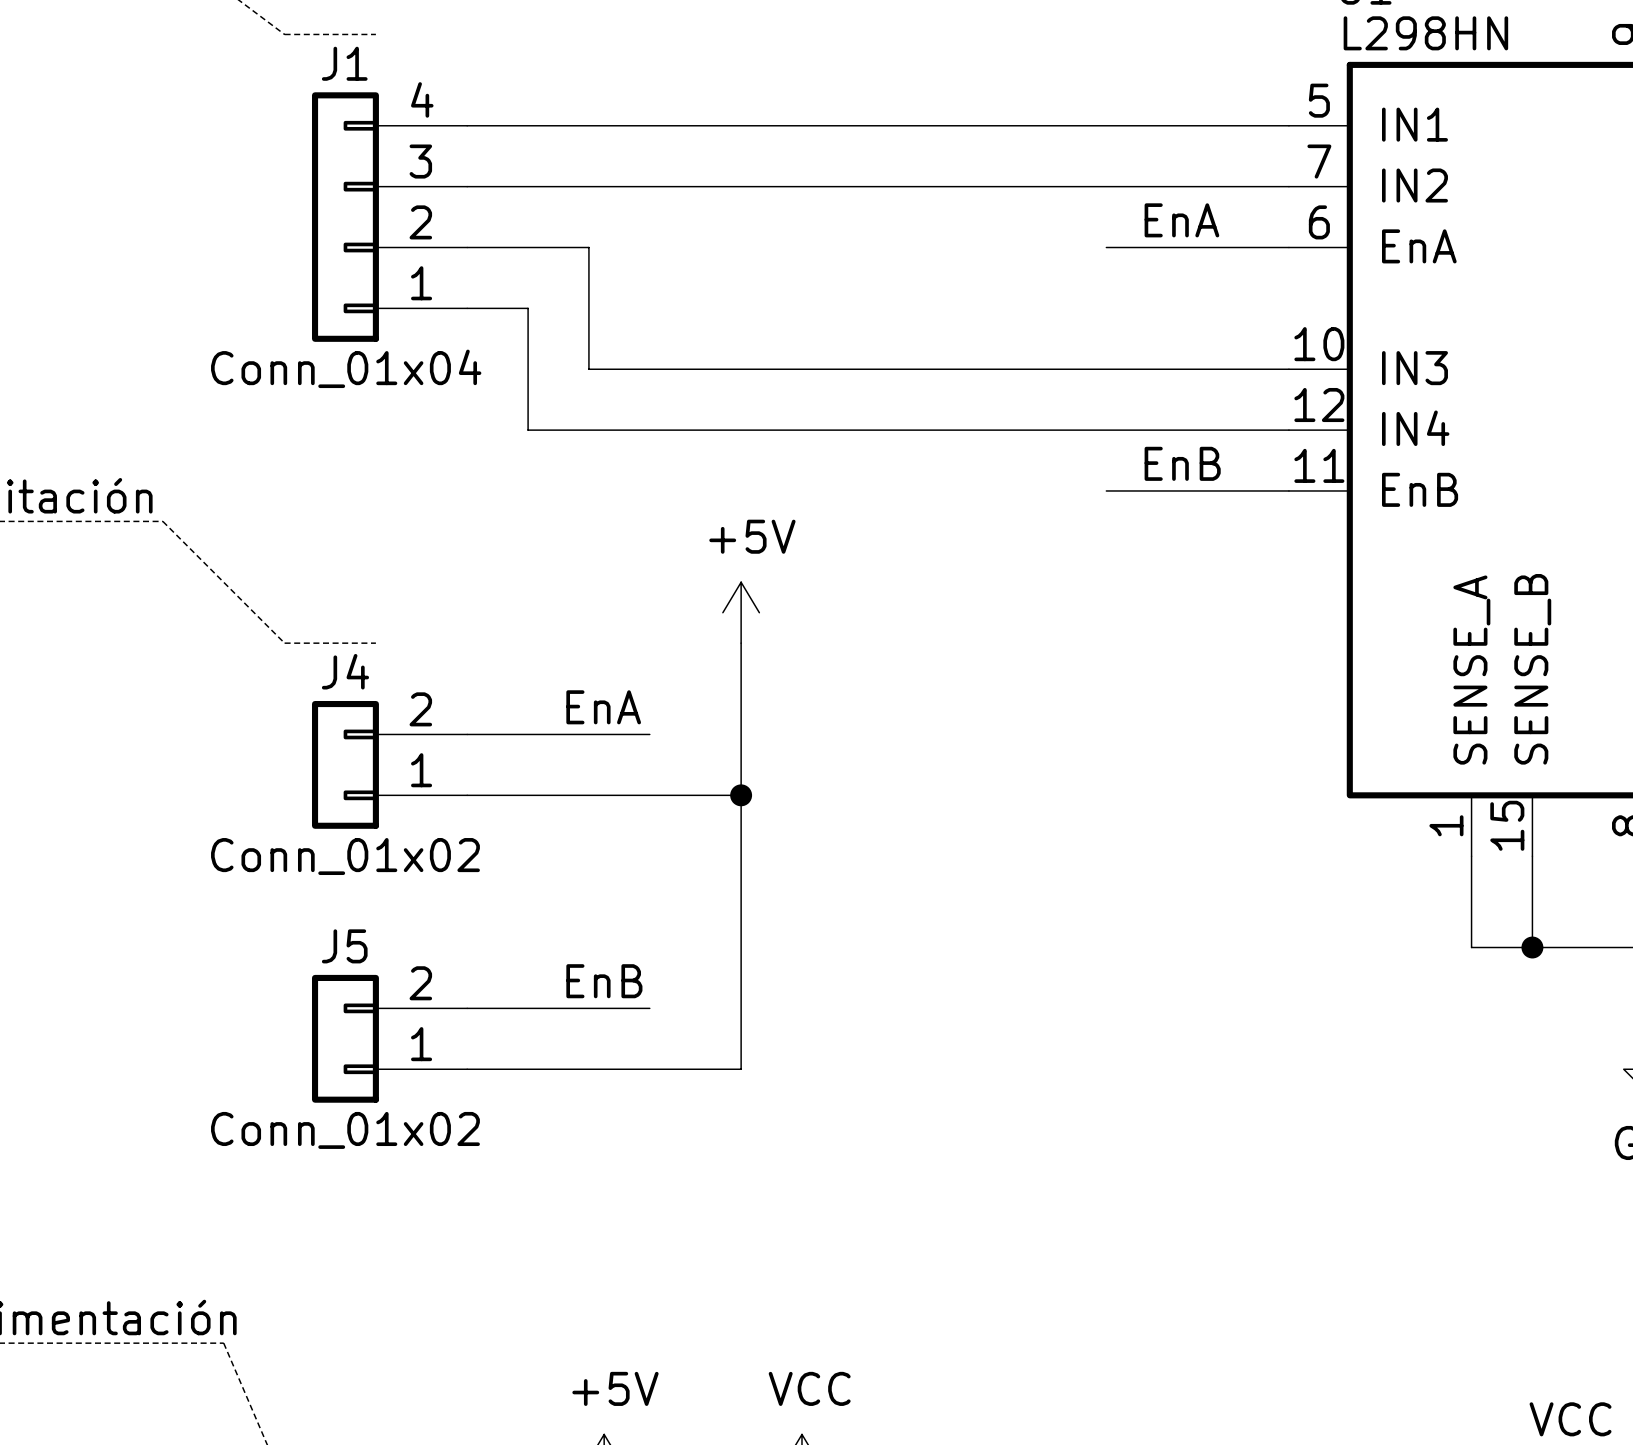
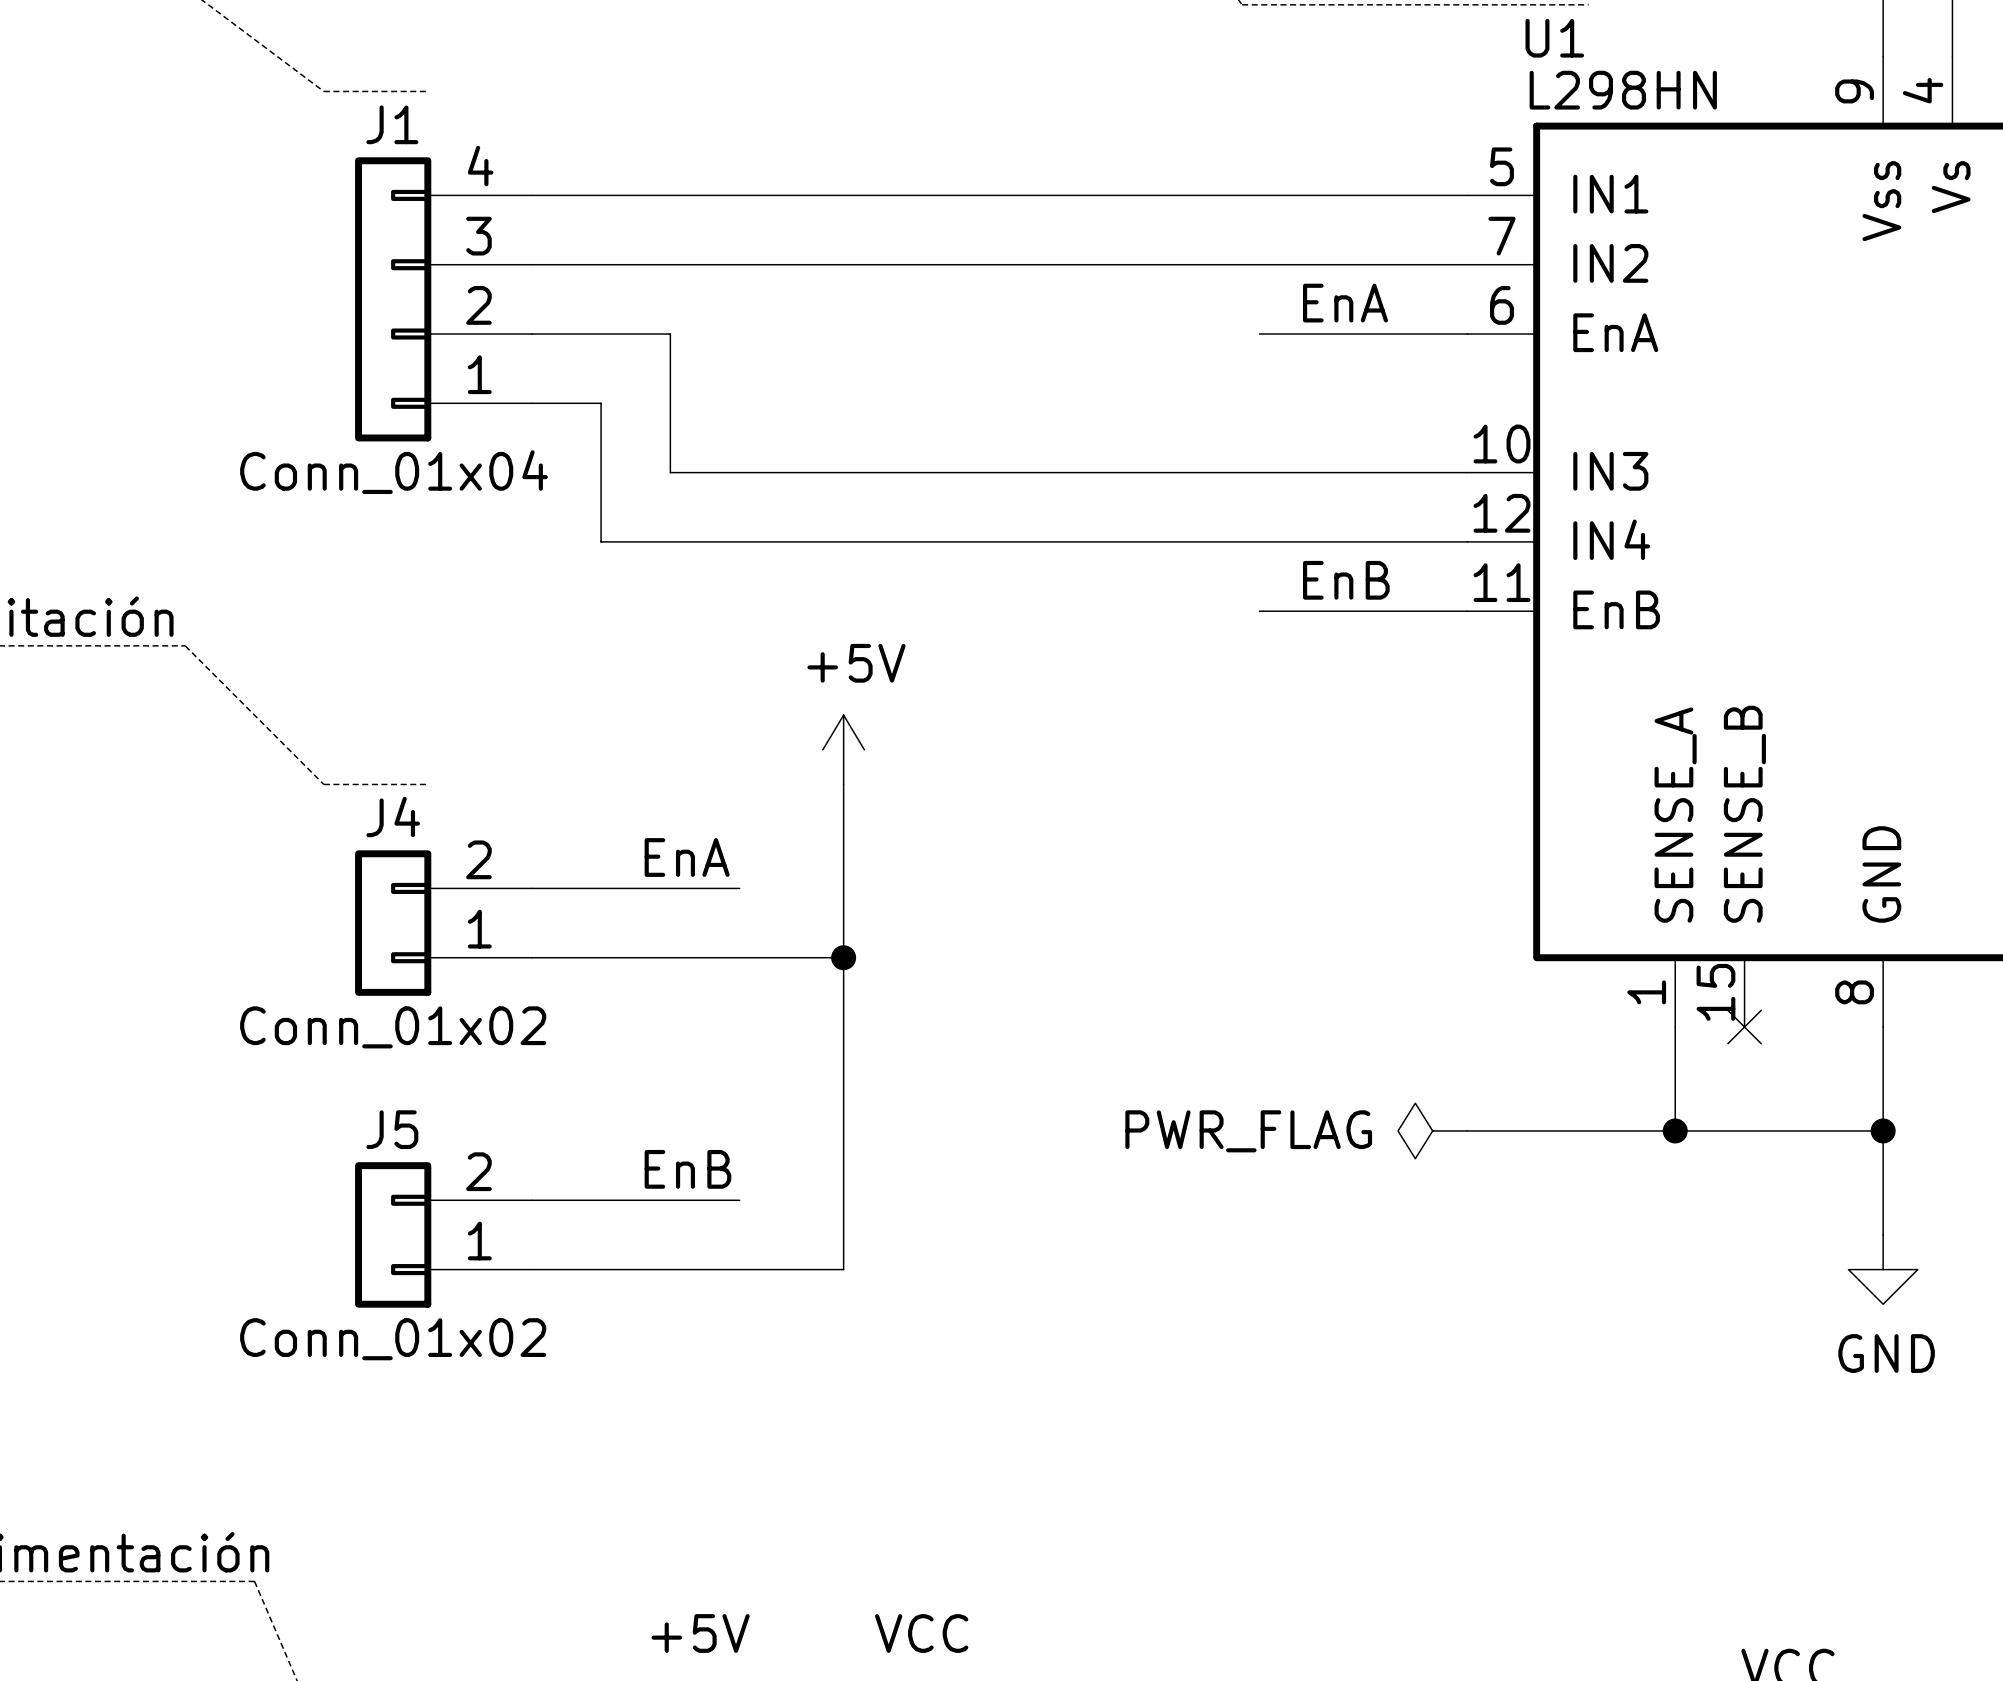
wire: (1532, 856) (1532, 947) -> none
no-connect mark: none -> (1744, 1027)
power symbol: none -> PWR_FLAG (1432, 1130)
wire: none -> (1467, 1130) (1675, 1130)
junction position: (1532, 947) -> (1675, 1130)

